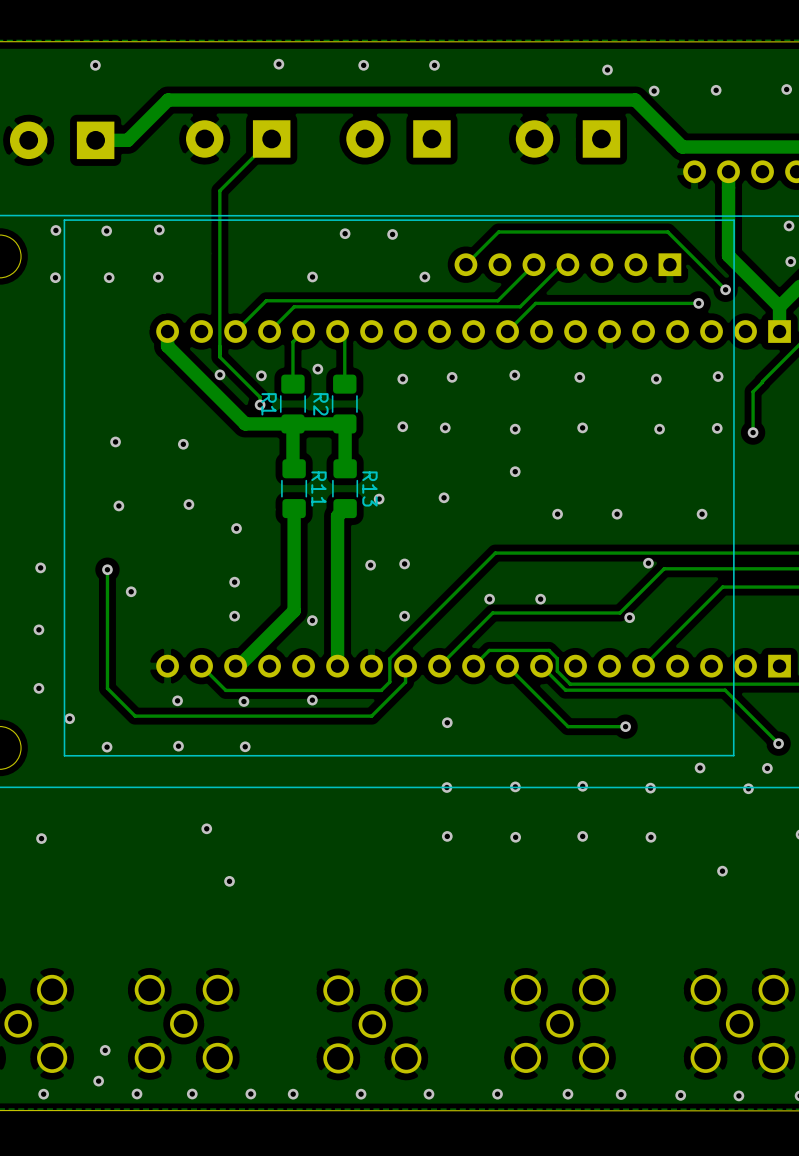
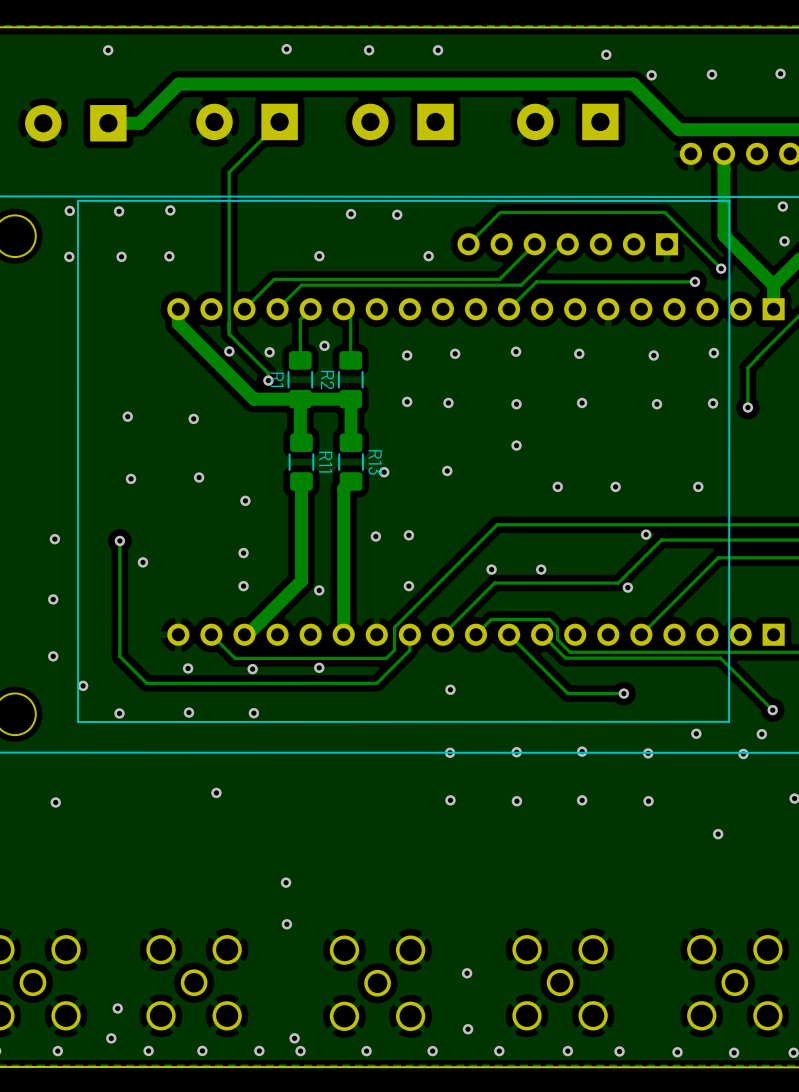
via: (229, 881) -> none
via: none -> (286, 882)
via: none -> (286, 924)
via: none -> (467, 973)
via: none -> (468, 1029)
via: none -> (294, 1038)

